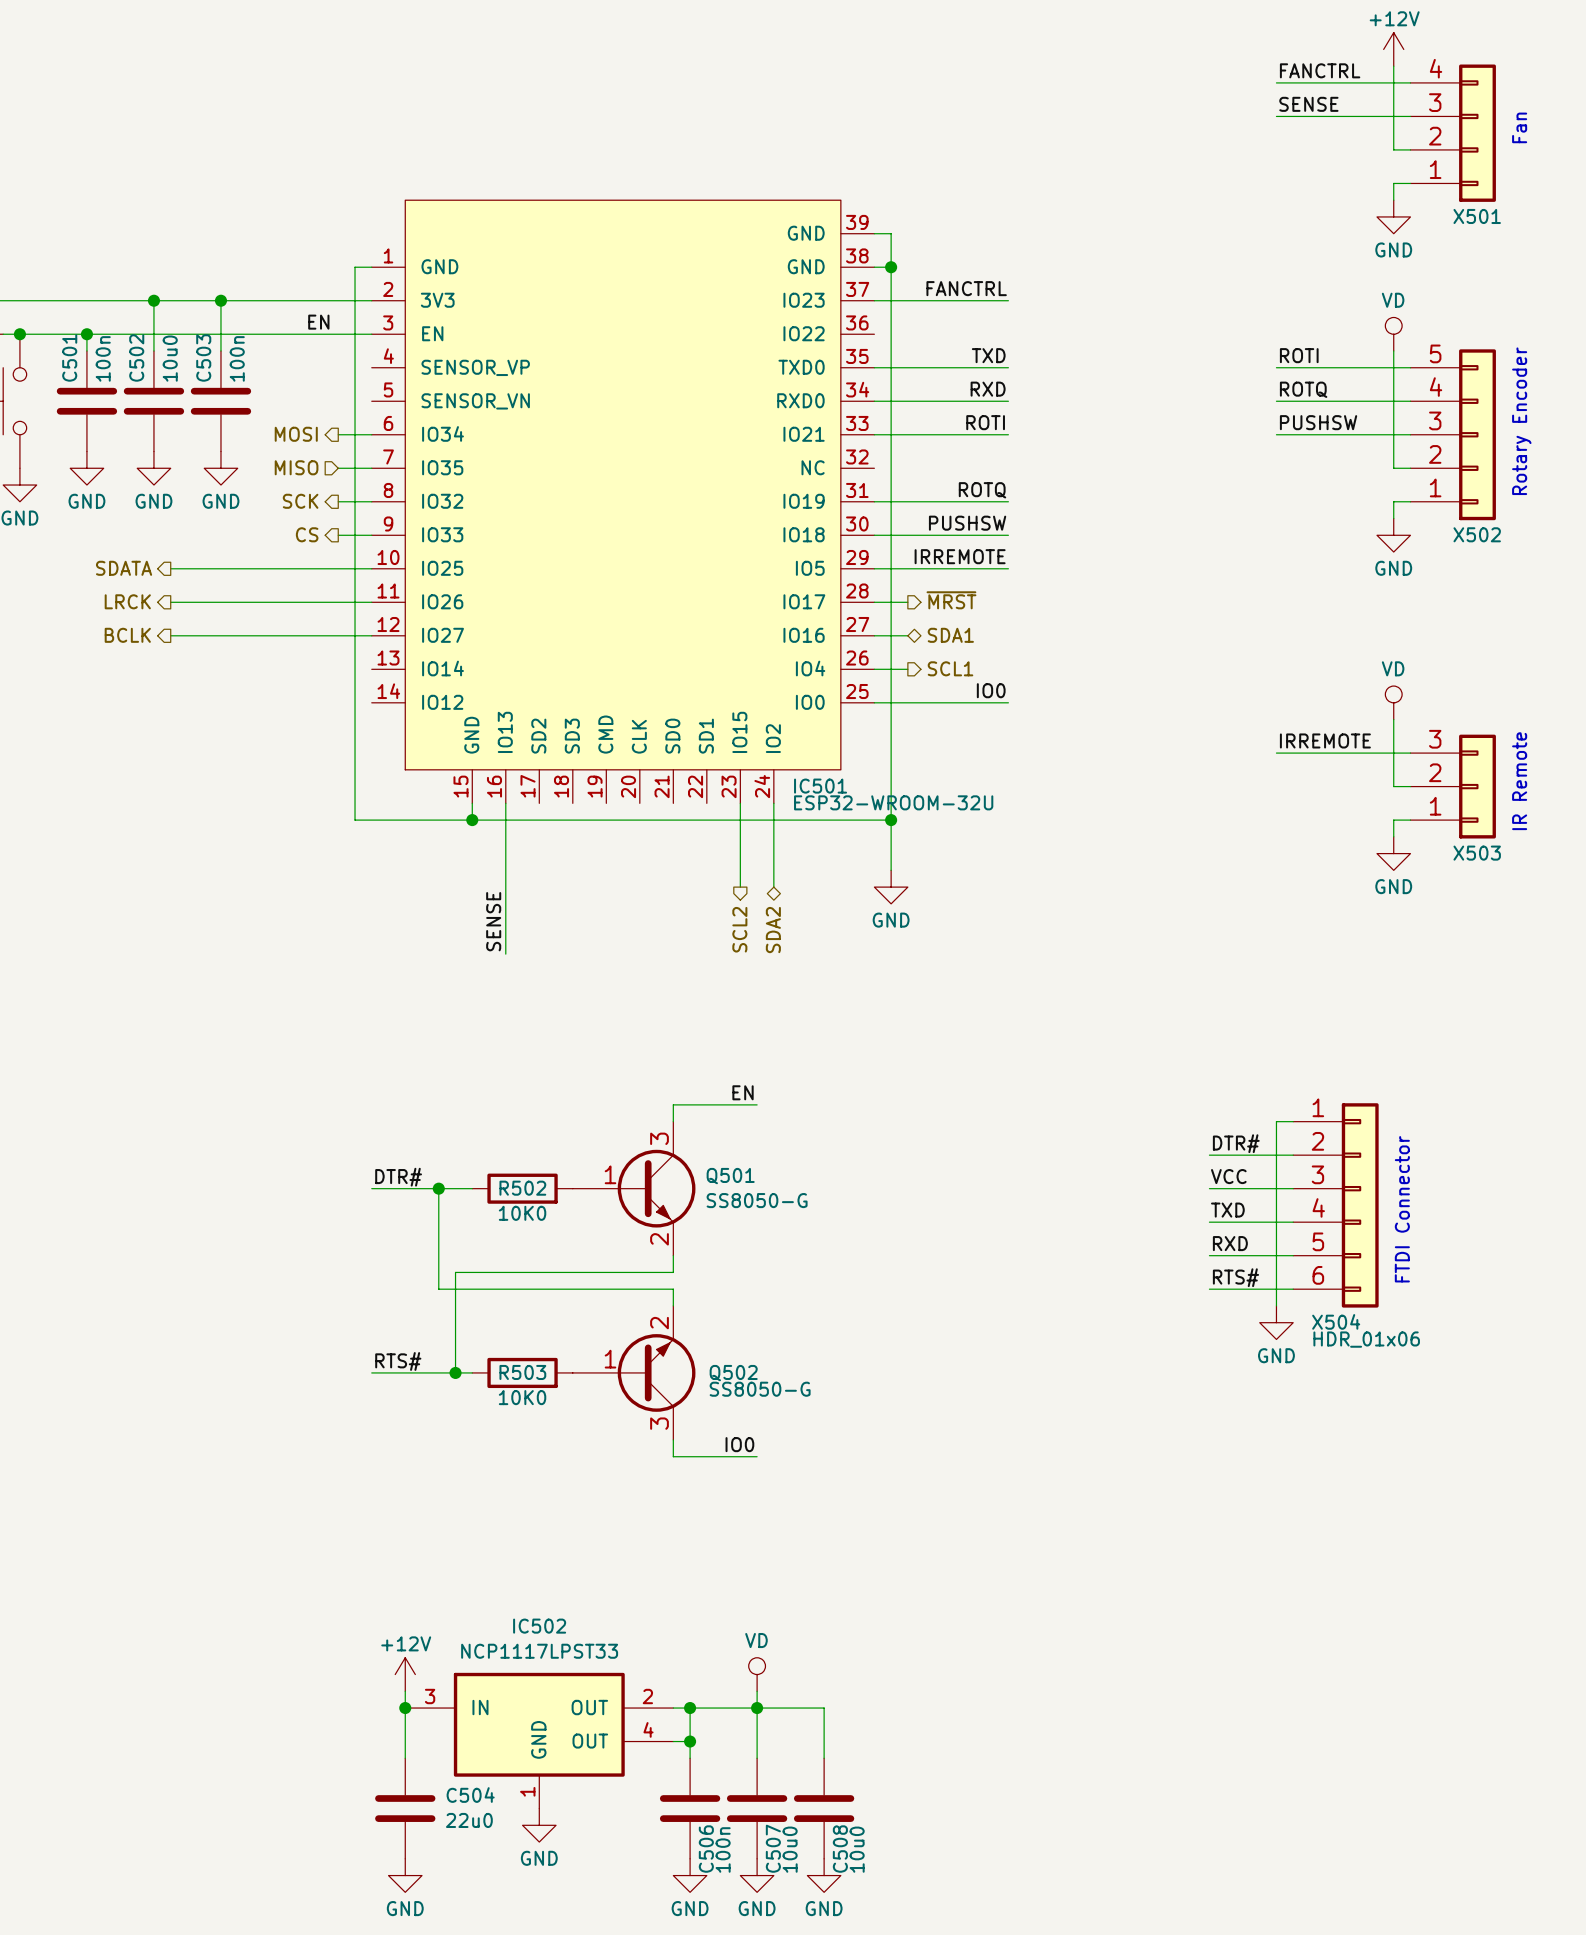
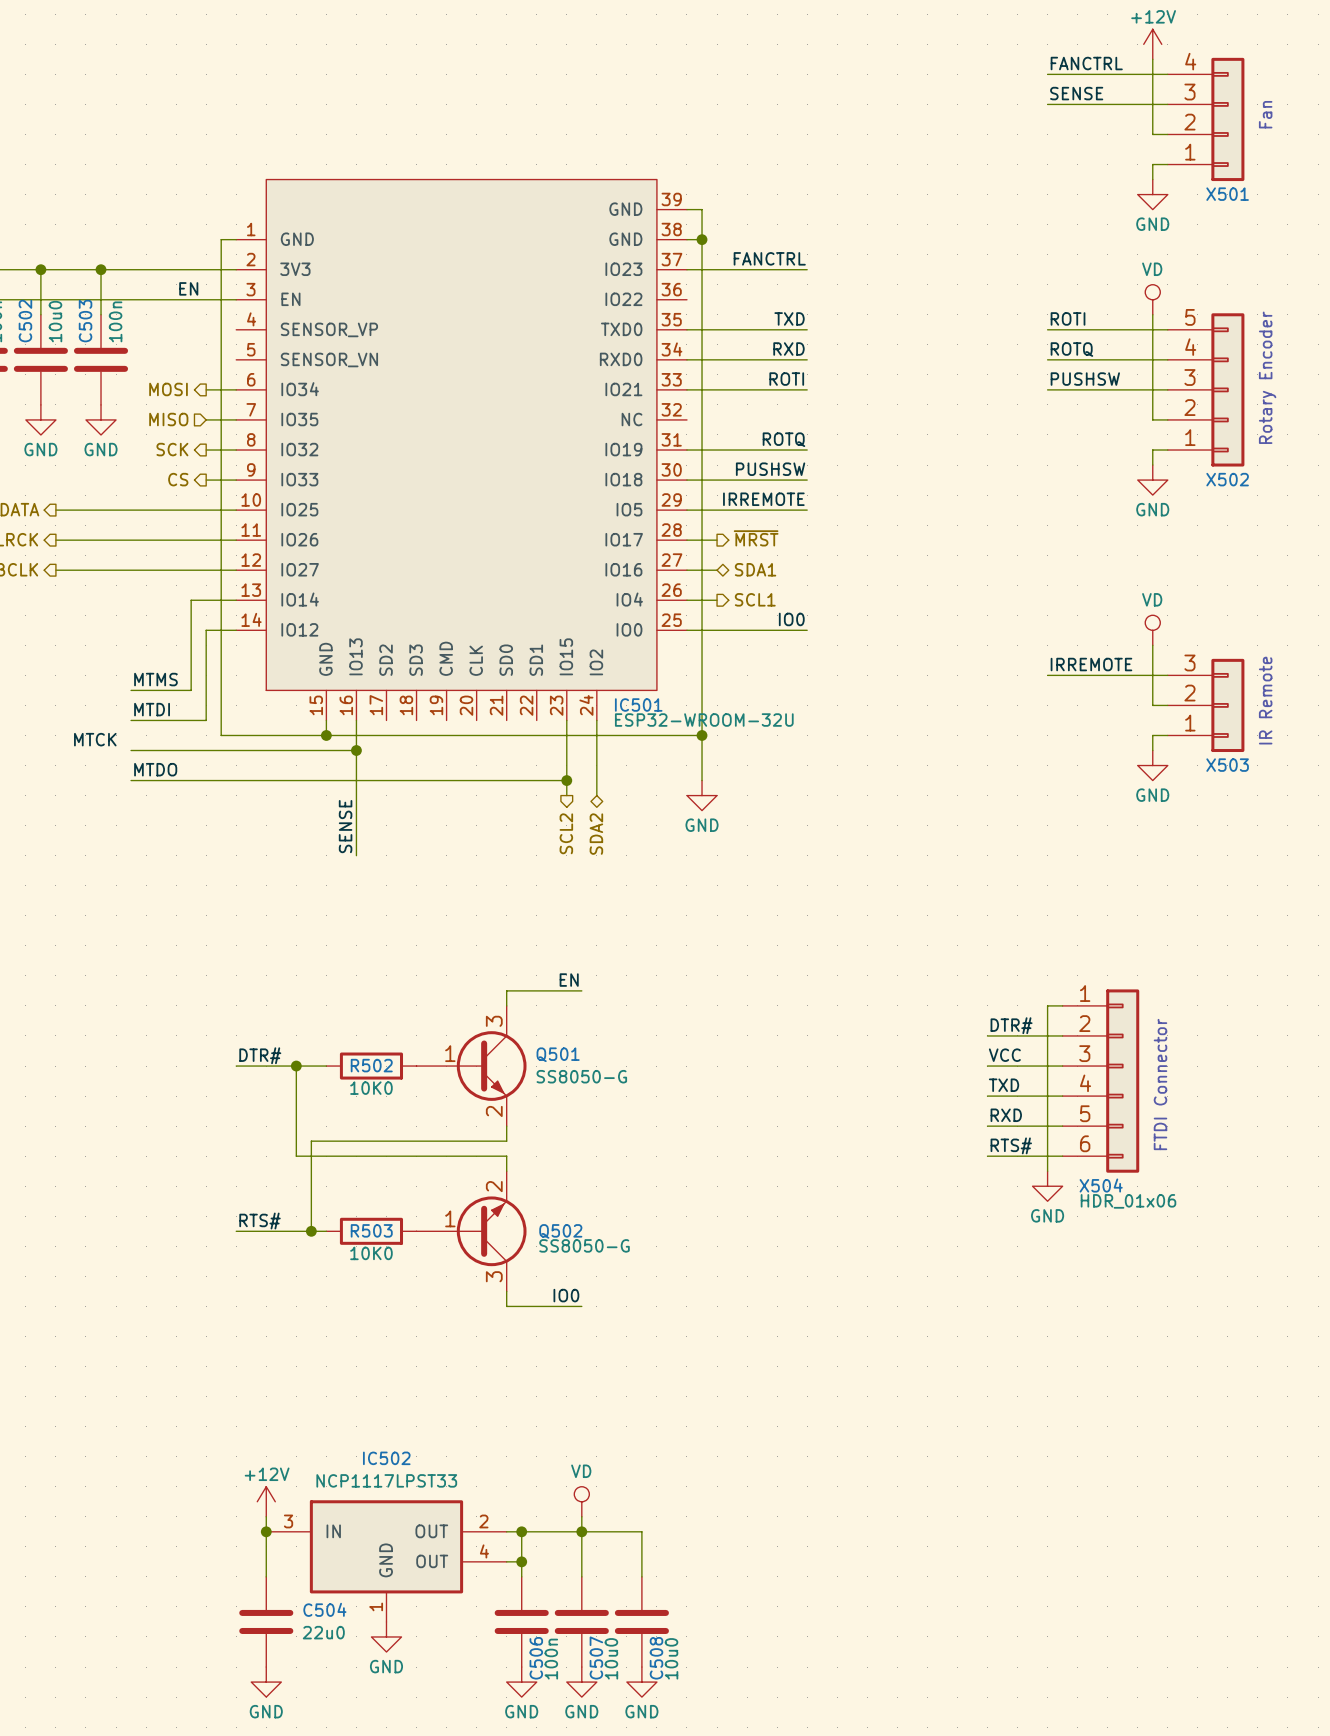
wire: none -> (236, 600) (191, 600) (191, 690) (131, 690)
wire: none -> (236, 630) (206, 630) (206, 720) (131, 720)
label: none -> MTMS (155, 679)
label: none -> MTDI (152, 709)
label: none -> MTCK (95, 739)
wire: none -> (131, 750) (356, 750)
junction: none -> (356, 750)
label: none -> MTDO (155, 769)
wire: none -> (131, 780) (566, 780)
junction: none -> (566, 780)

